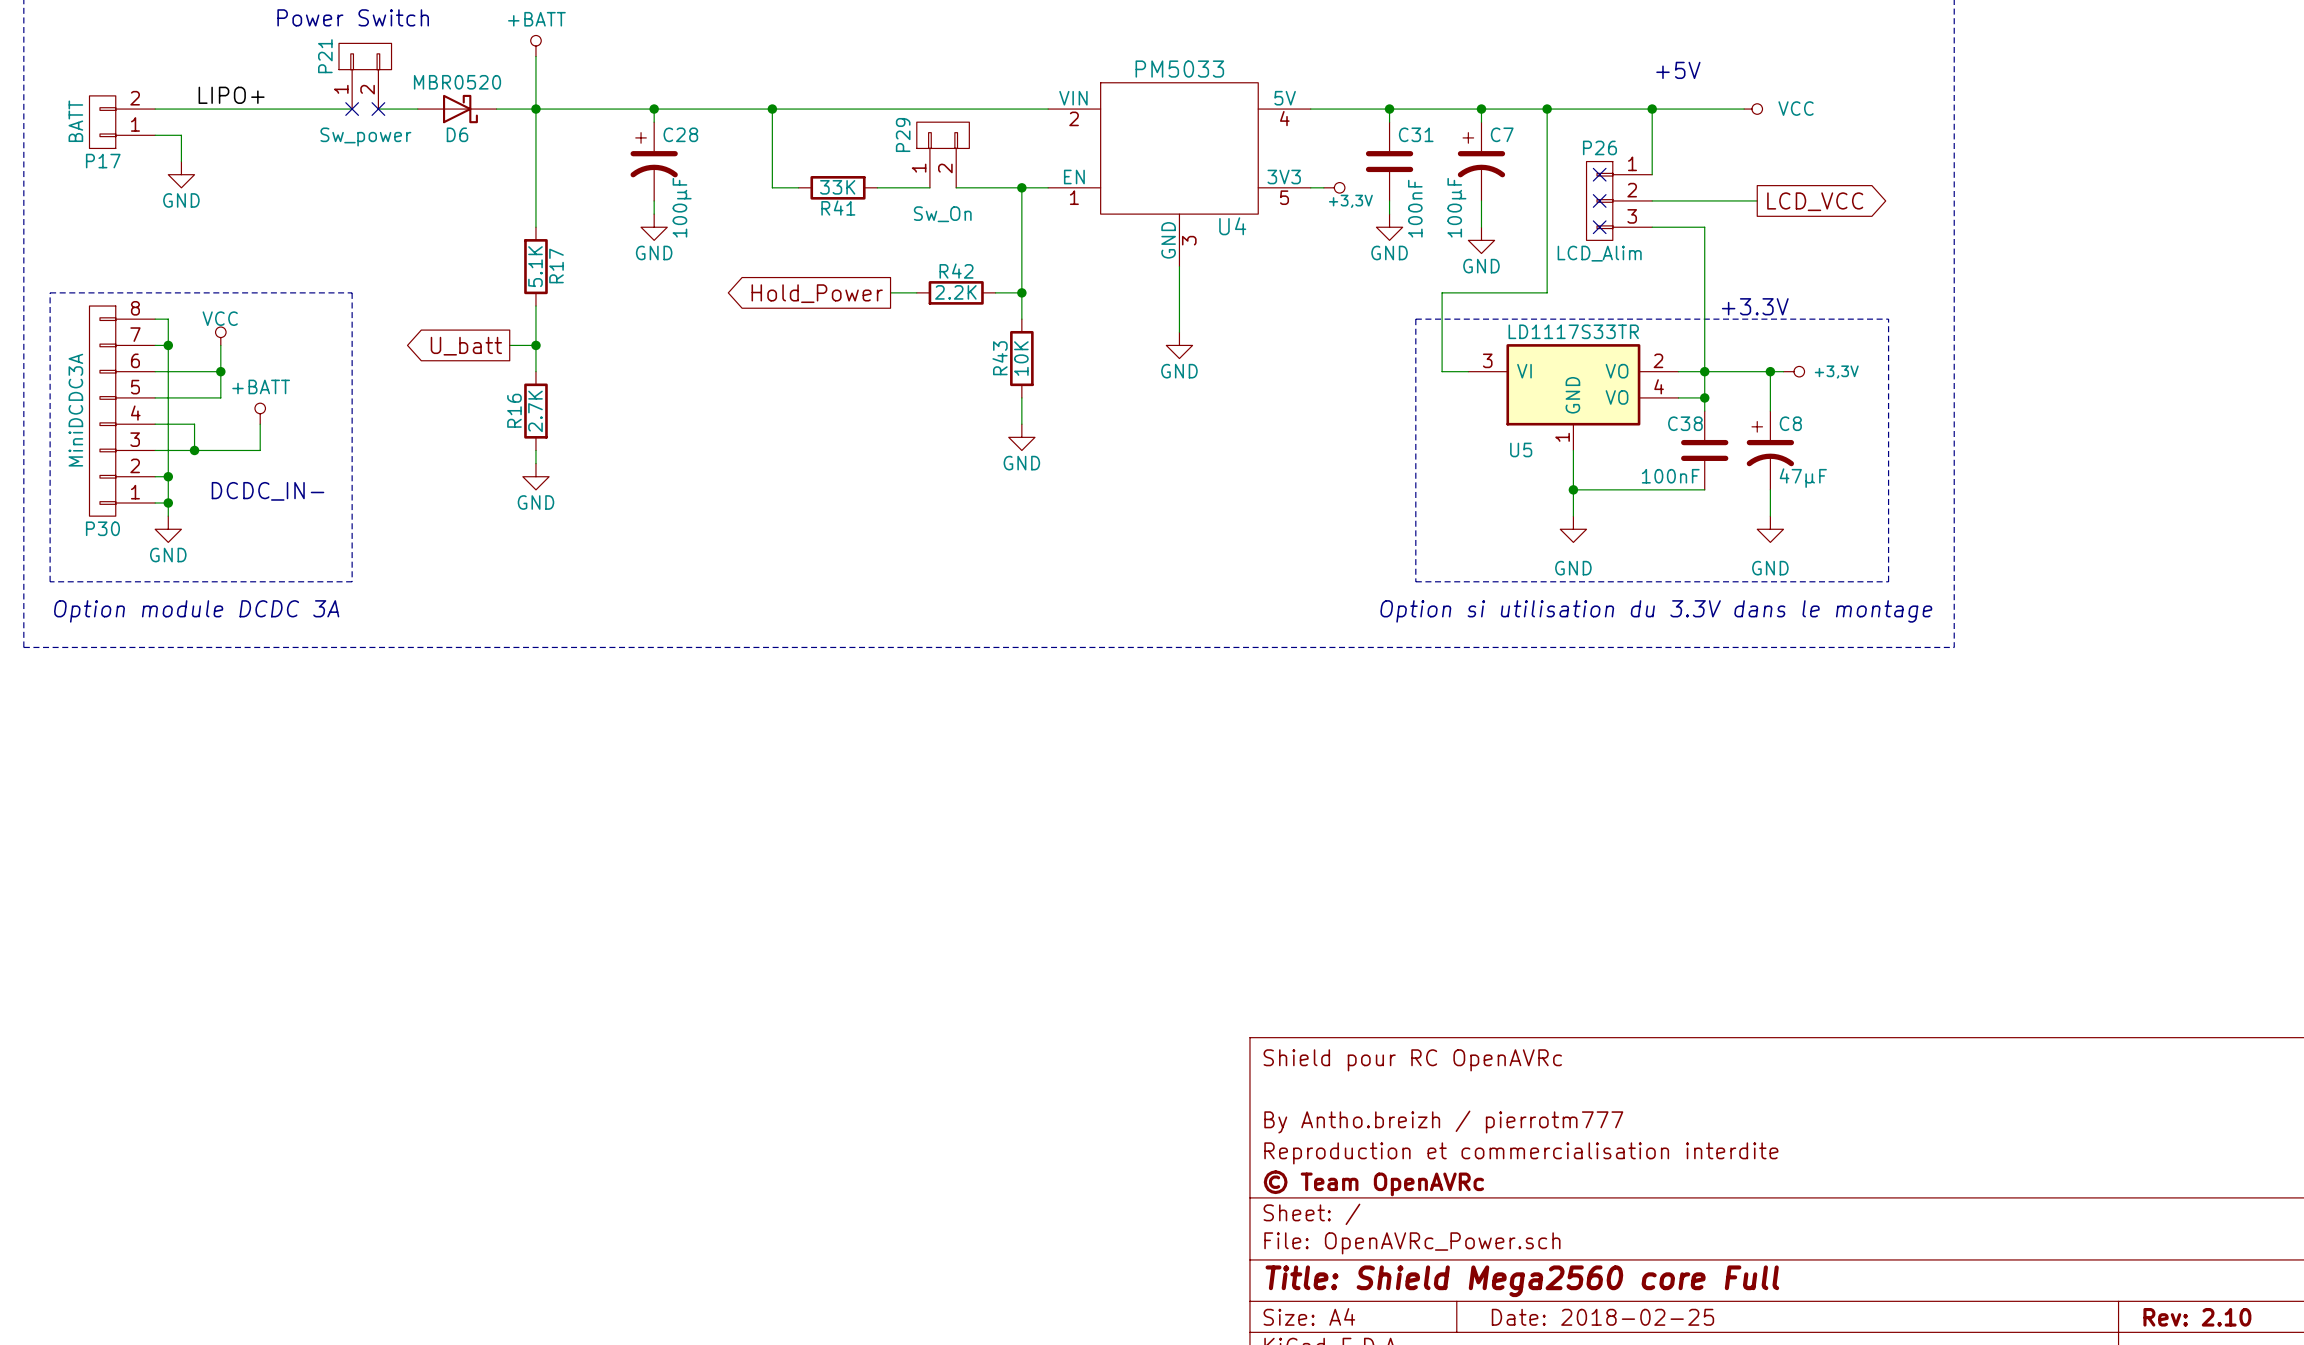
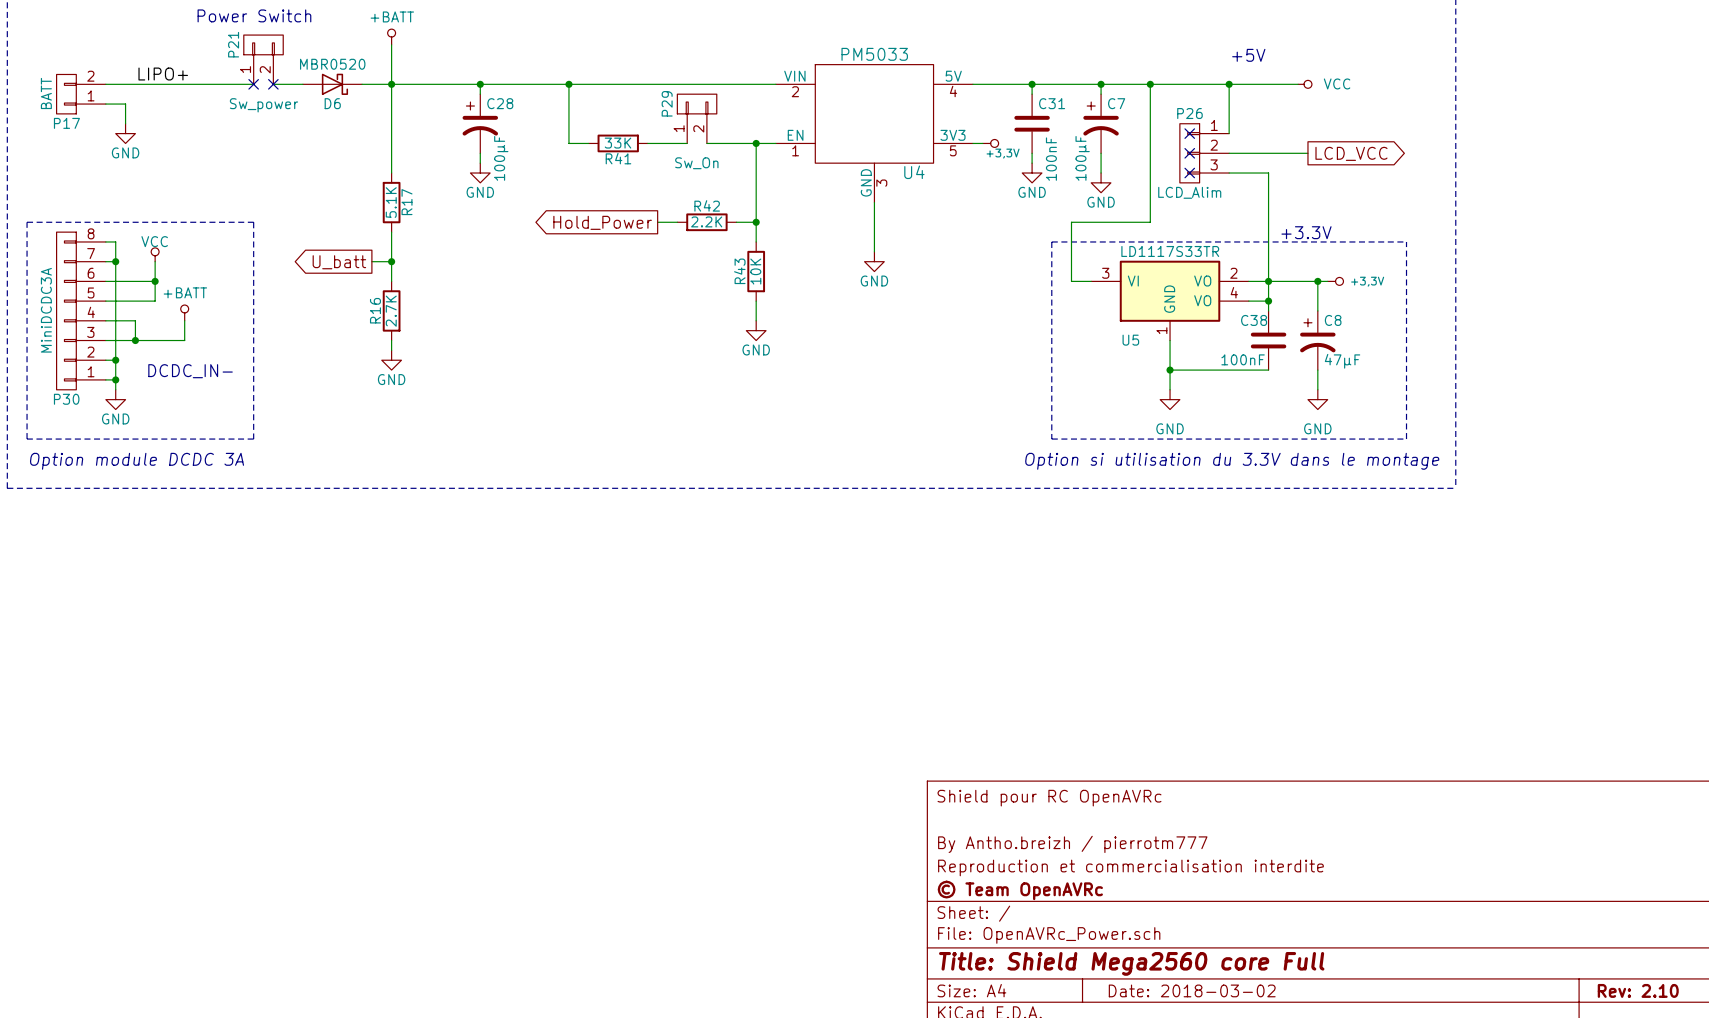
title block: Date: 2018-02-25 (1602, 1317) -> Date: 2018-03-02 (1192, 990)

